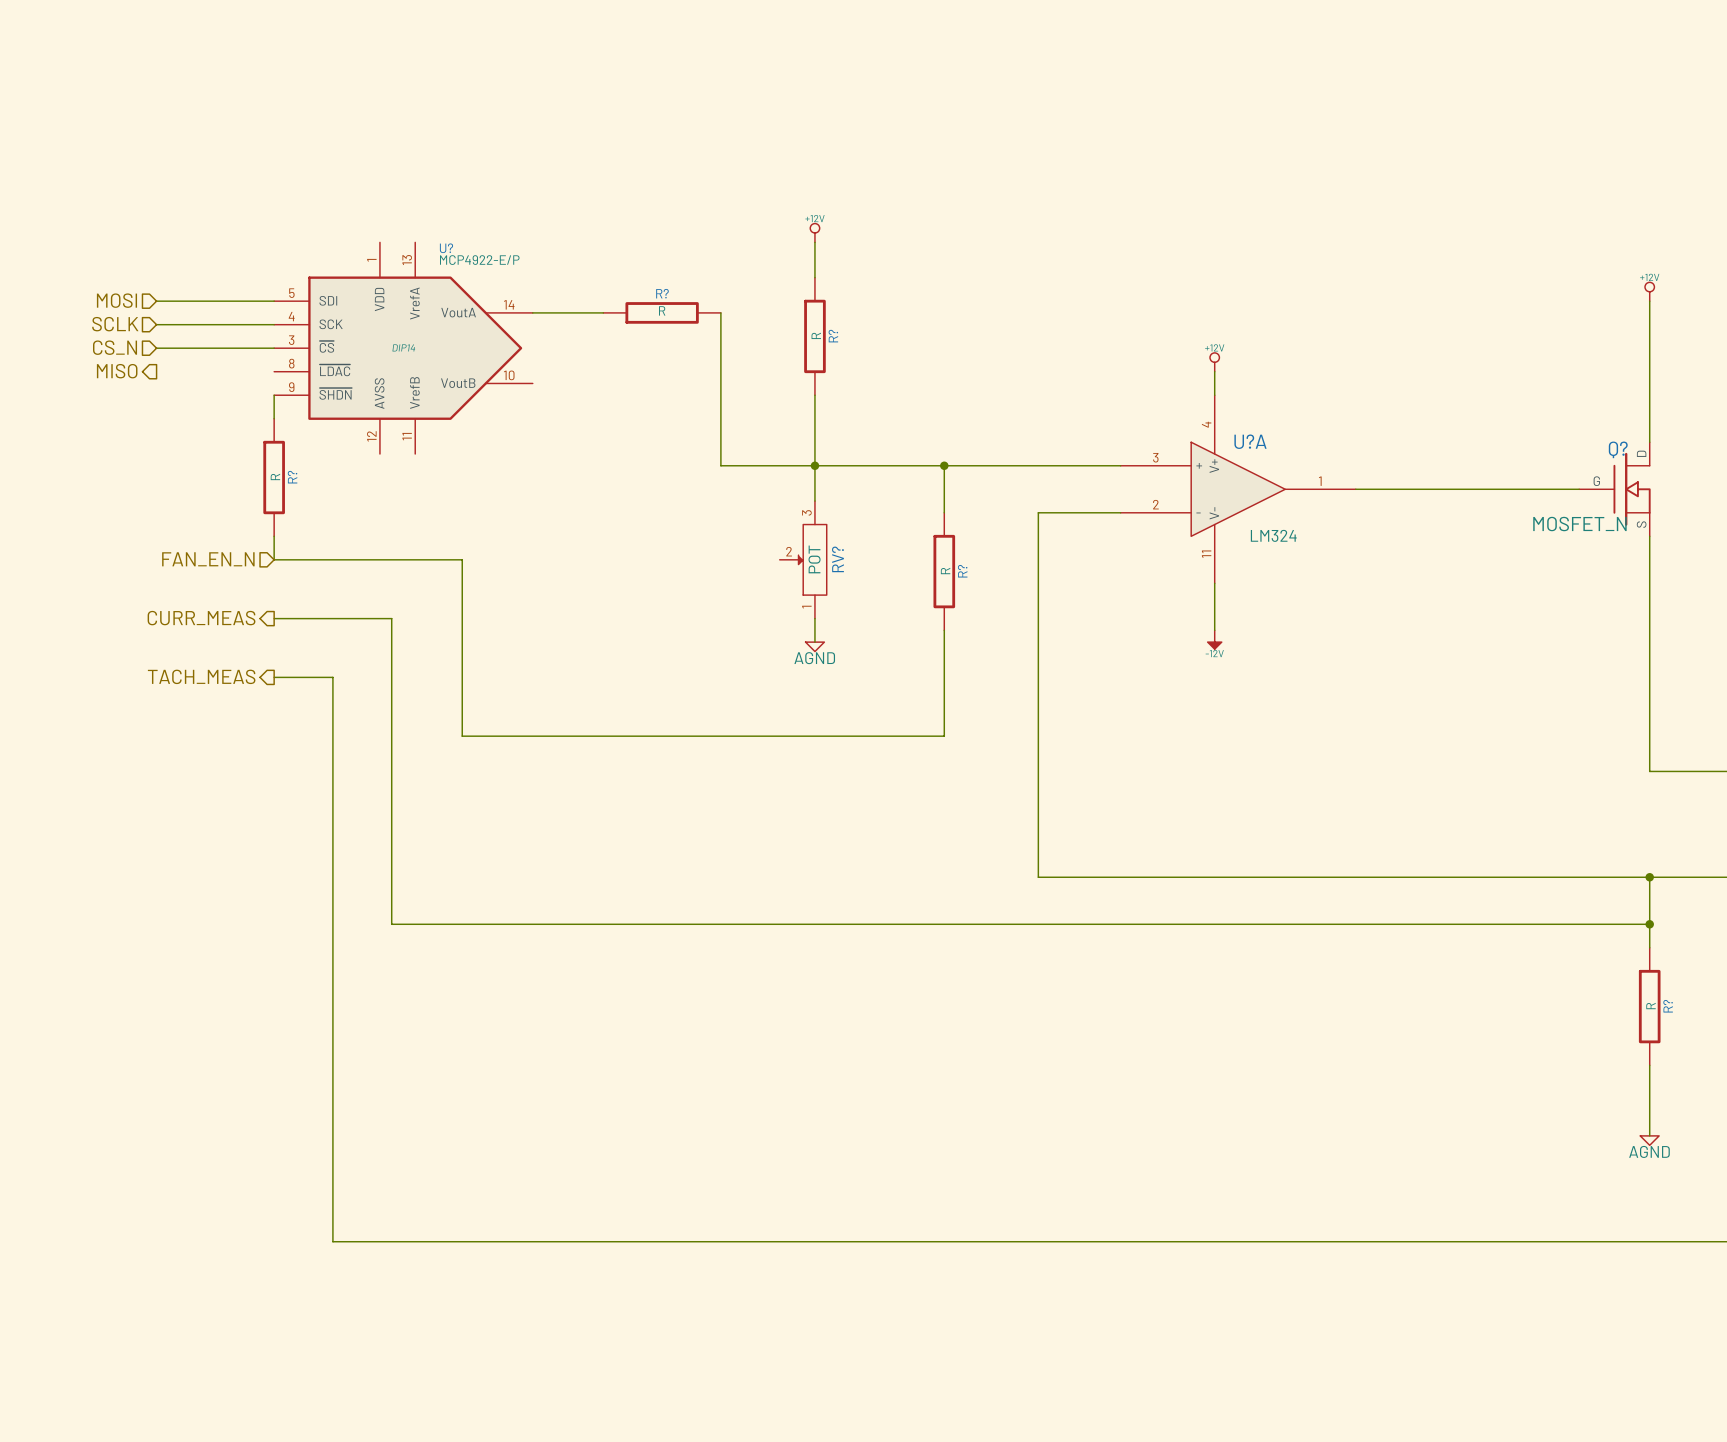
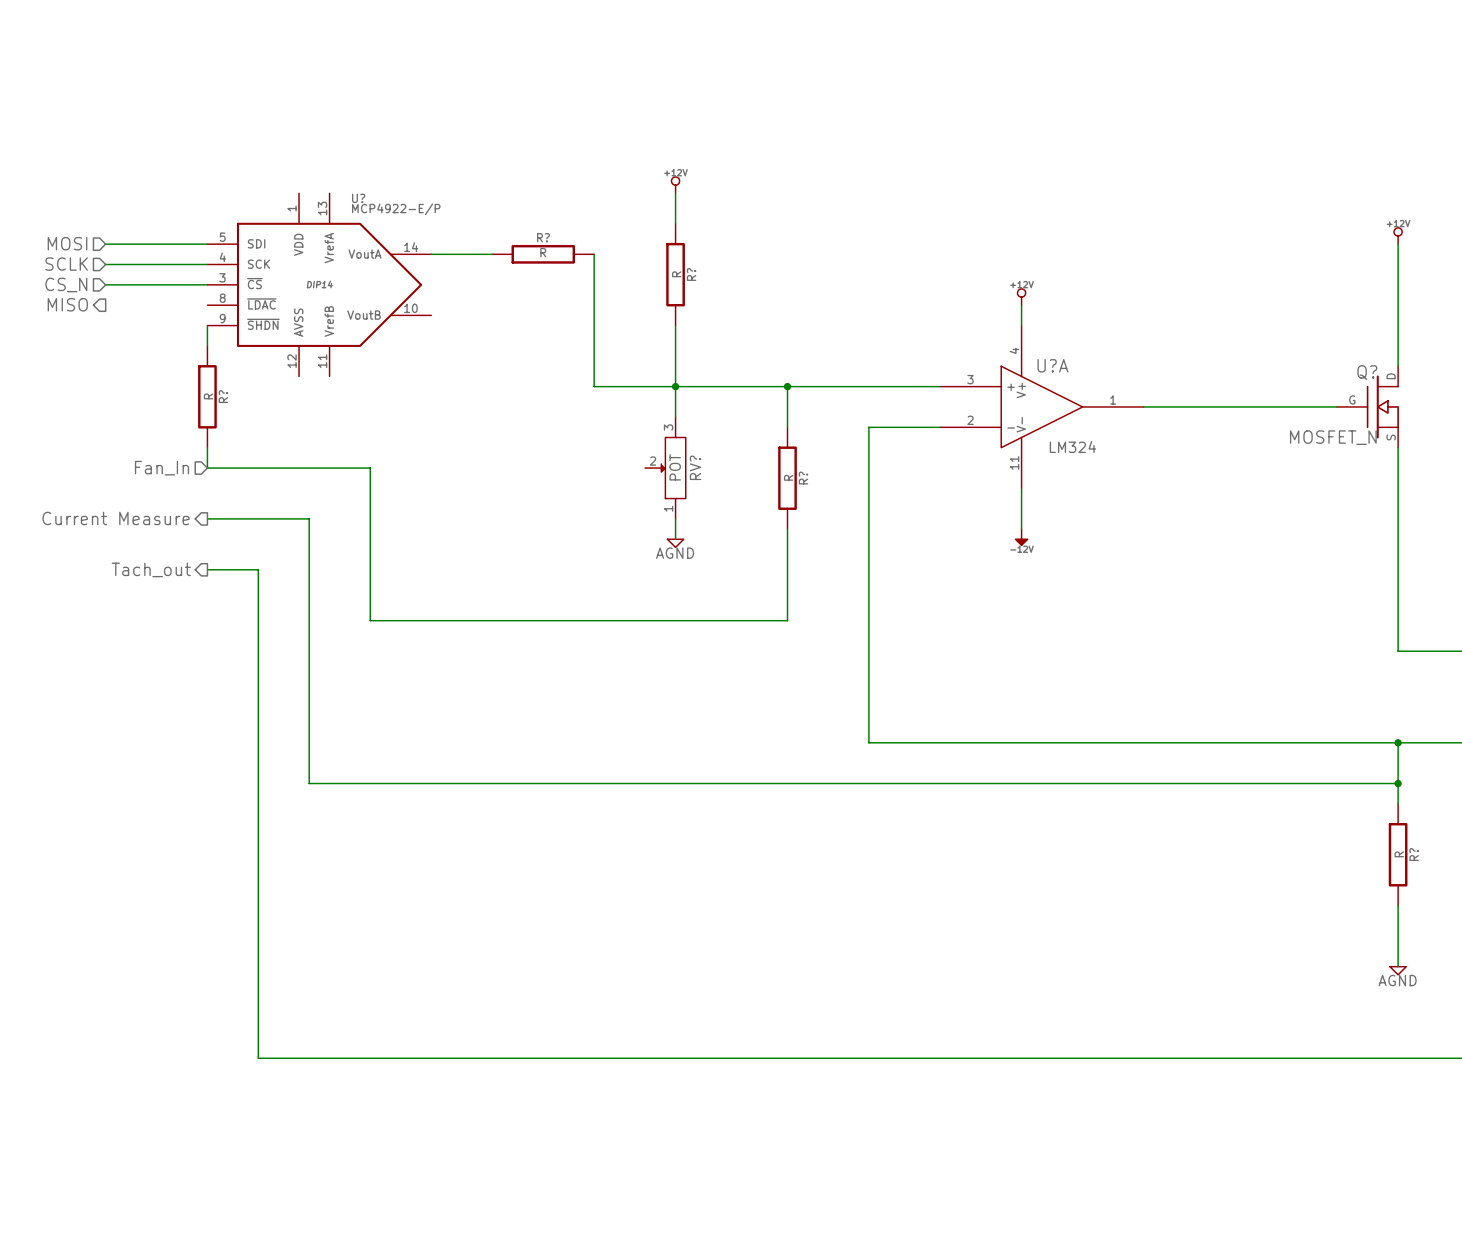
hierarchical label: FAN_EN_N (208, 559) -> Fan_In (162, 468)
hierarchical label: CURR_MEAS (201, 618) -> Current Measure (116, 518)
hierarchical label: TACH_MEAS (201, 676) -> Tach_out (151, 569)

